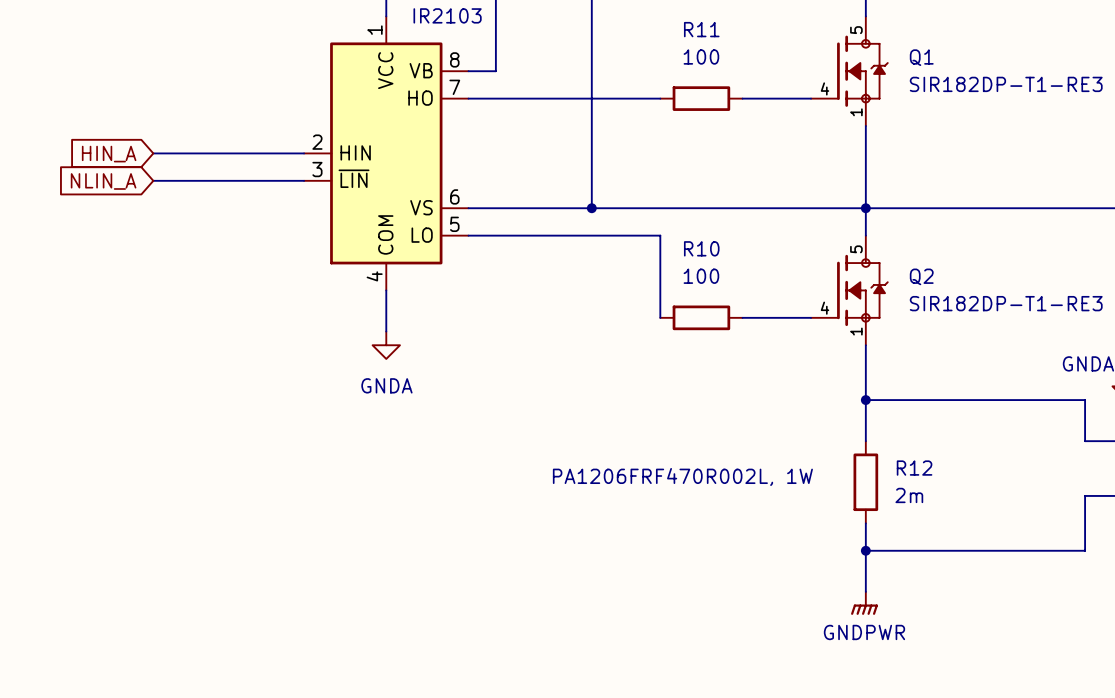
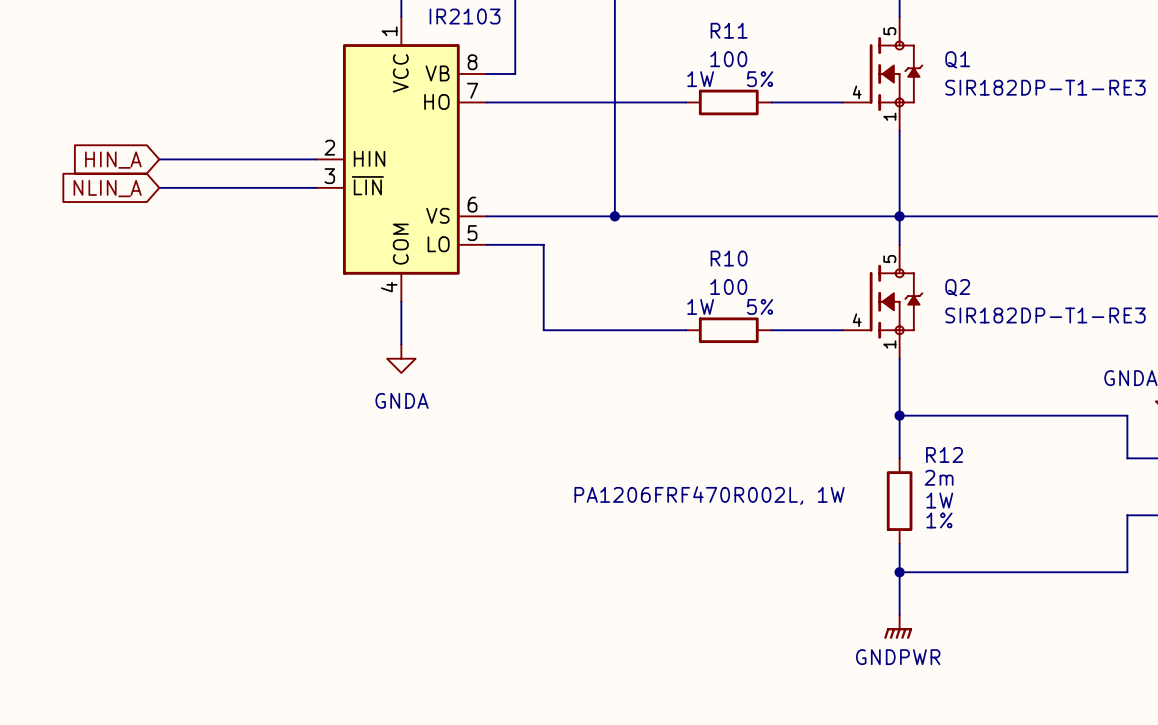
R11 text: none -> 1W (700, 79)
R11 text: none -> 5% (760, 79)
wire: (523, 235) (660, 235) (660, 317) -> (543, 244) (543, 330) (686, 330)
R10 text: none -> 1W (700, 306)
R10 text: none -> 5% (760, 306)
R12 name position: R12 (914, 468) -> R12 (944, 454)
R12 text: none -> 1W (939, 500)
R12 value position: 2m (909, 495) -> 2m (939, 477)
R12 text: none -> 1% (939, 520)

